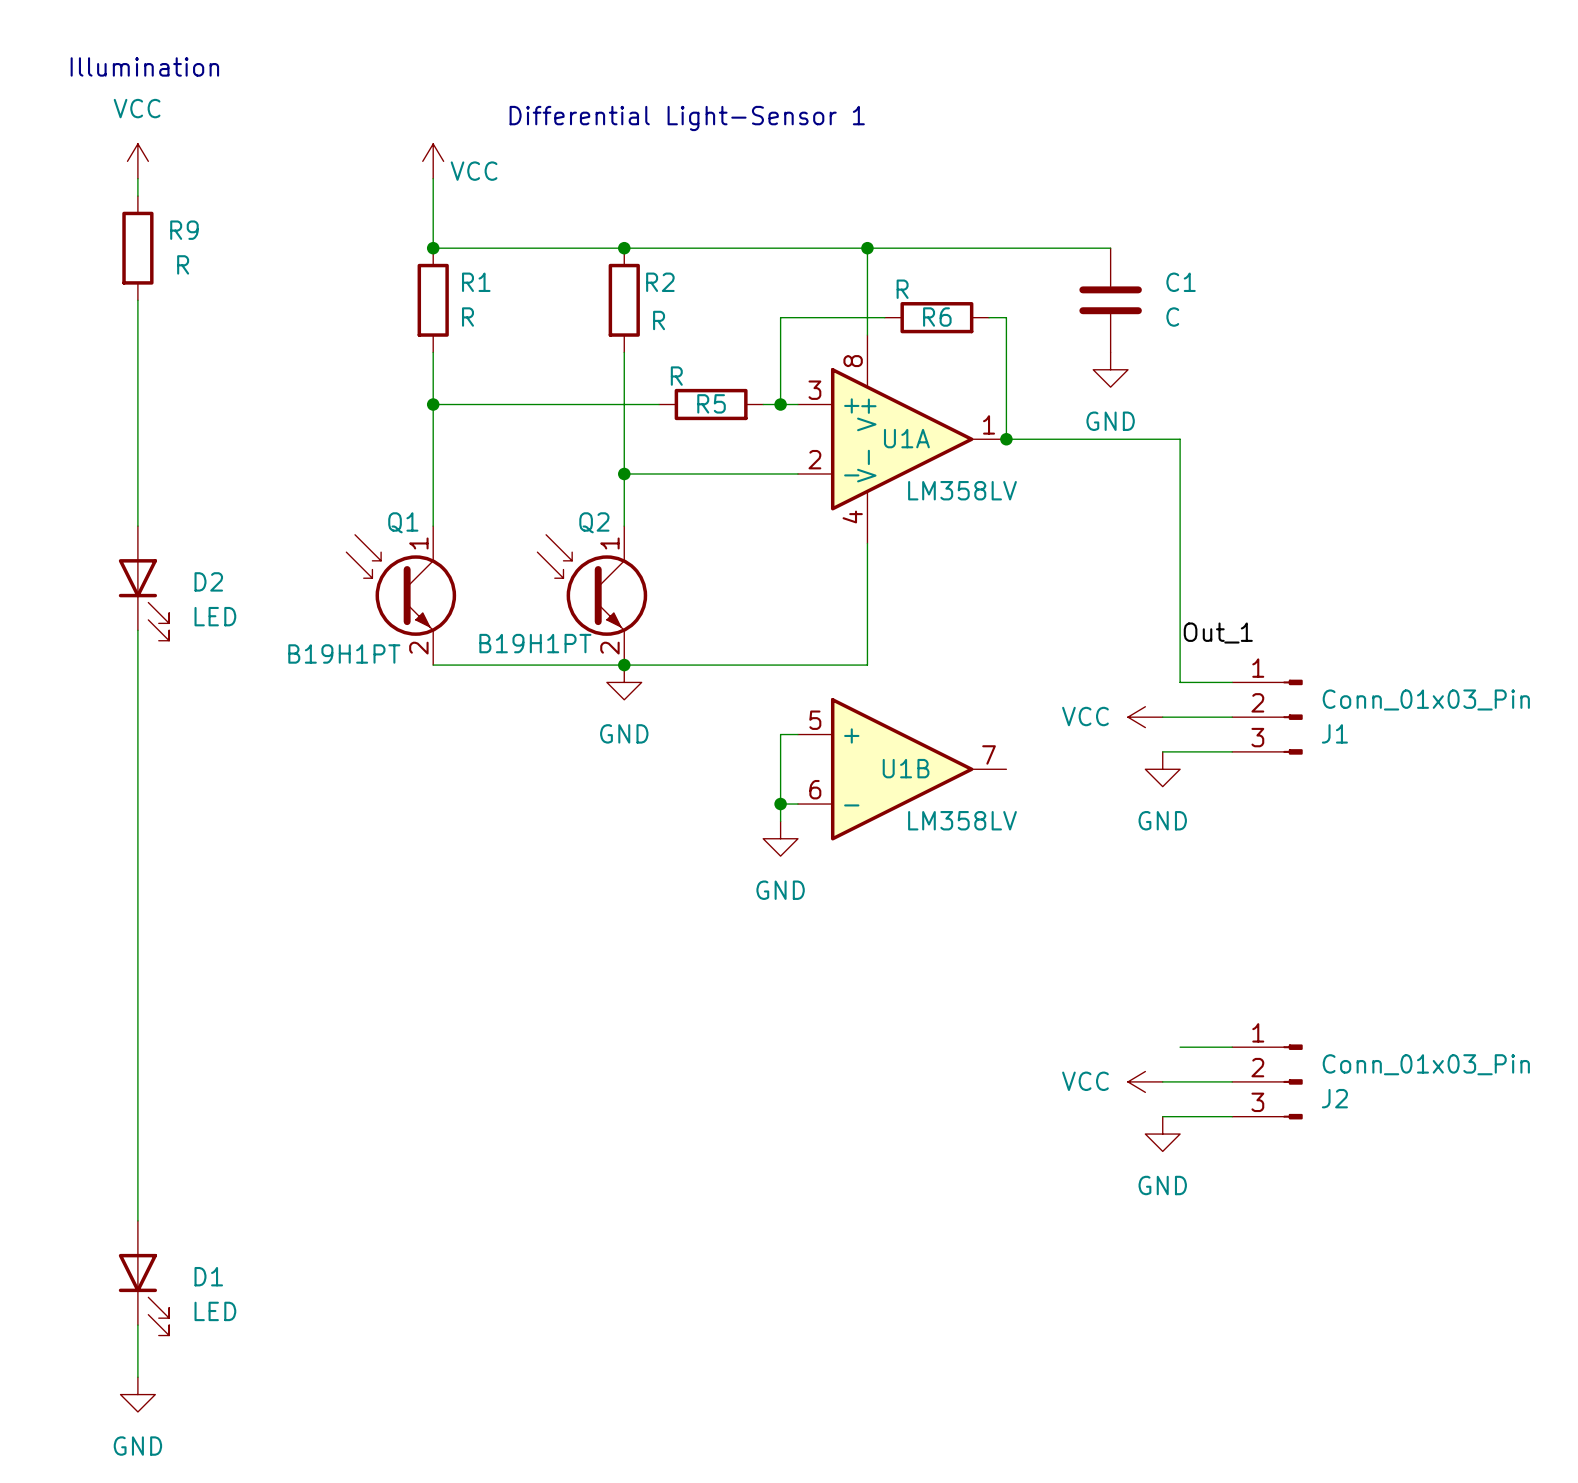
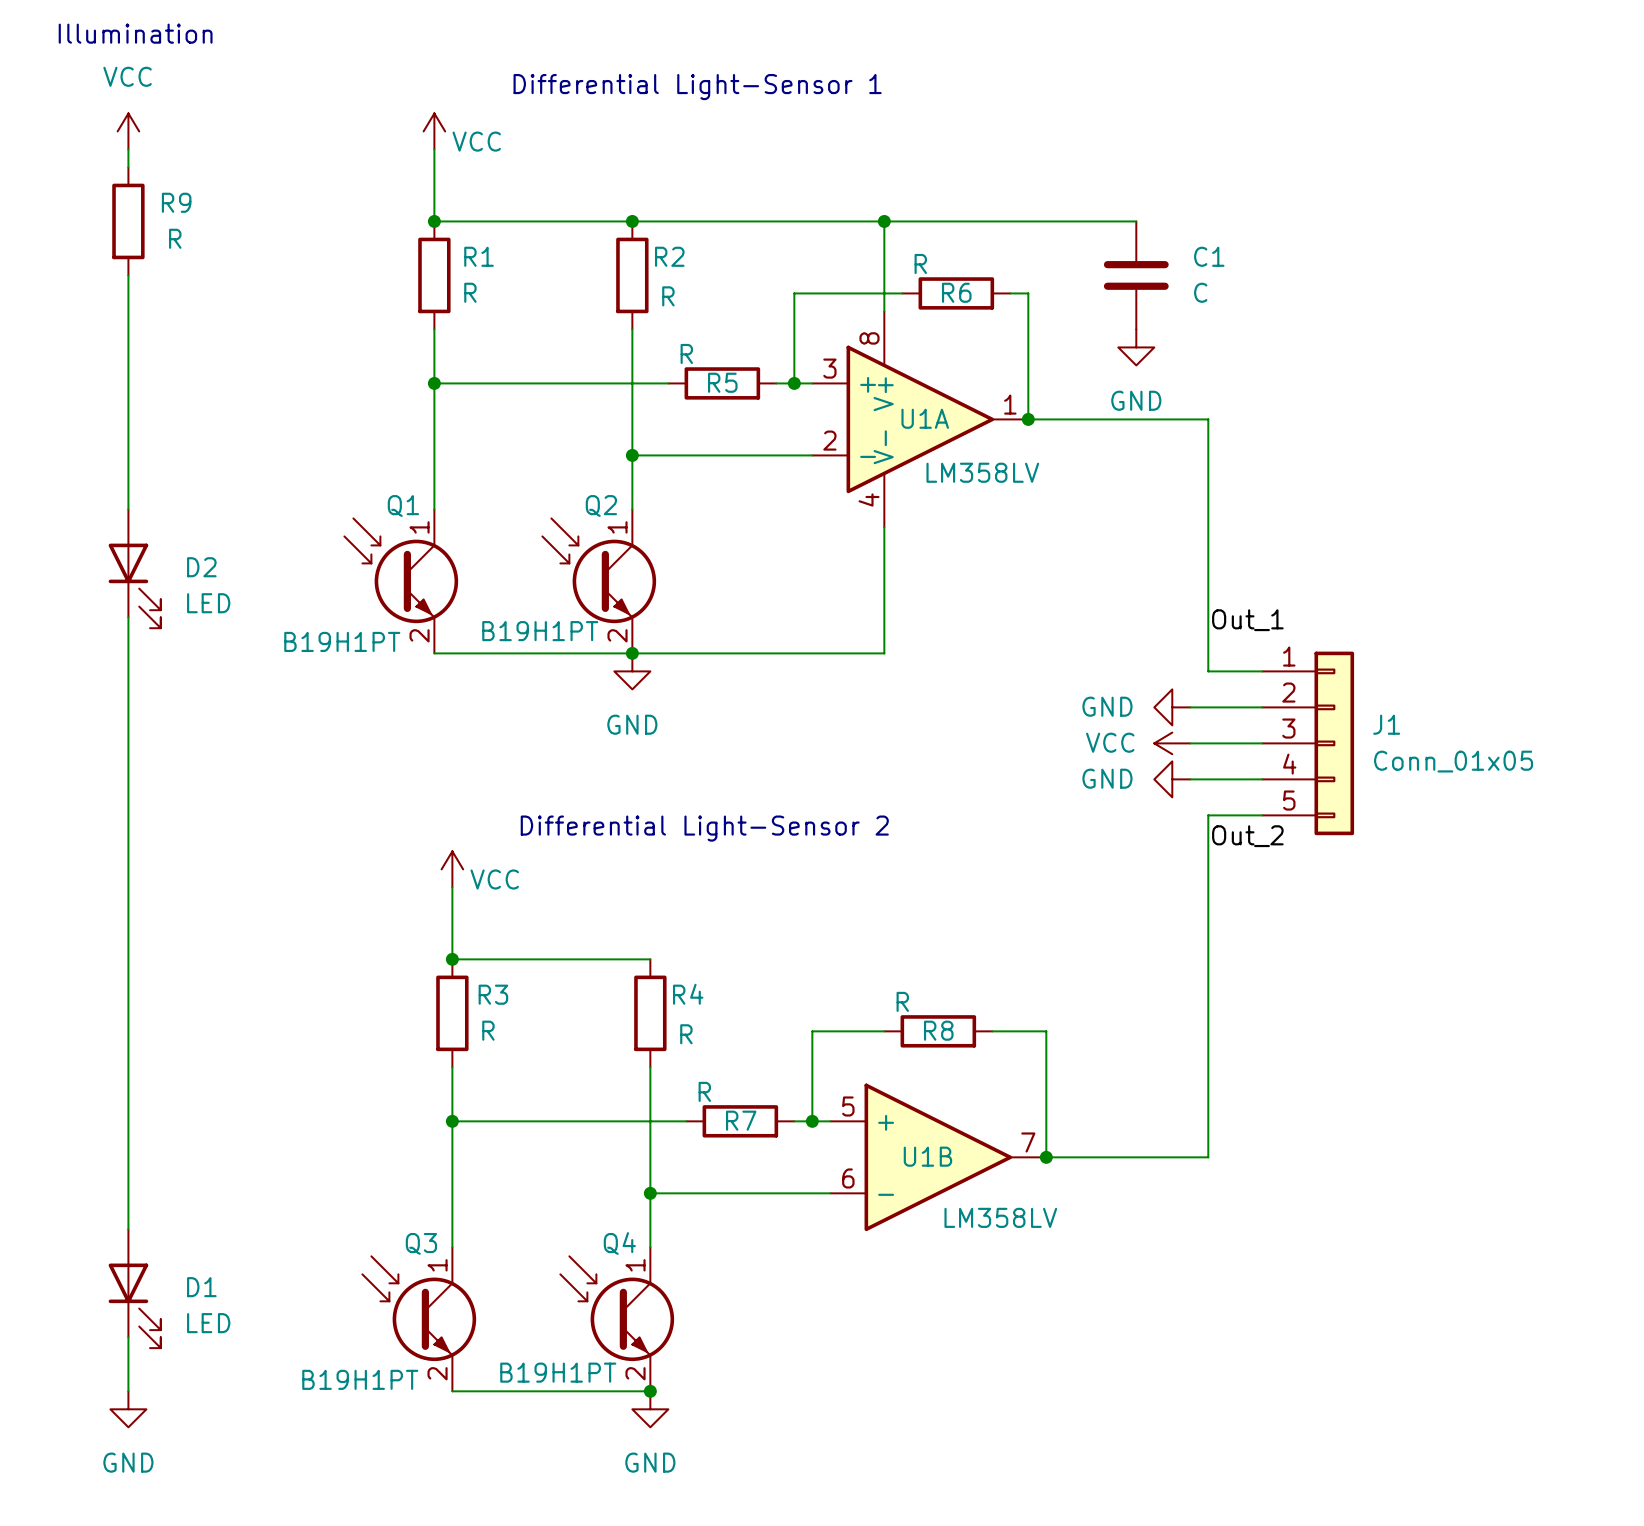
J1 symbol: [1232, 679, 1303, 755] -> [1262, 651, 1355, 836]
J1 value: Conn_01x03_Pin (1426, 699) -> Conn_01x05 (1453, 761)
power symbol: VCC (1145, 717) -> GND (1172, 707)
J1 name position: J1 (1334, 733) -> J1 (1386, 724)
wire: (797, 734) (780, 734) (780, 821) -> none
U1B name position: U1B (906, 768) -> U1B (927, 1156)
U1B position: (902, 769) -> (938, 1157)
power symbol rotation: 0° (1162, 769) -> 90° clockwise (1172, 779)
power symbol position: GND (1162, 769) -> GND (1172, 779)
wire: (780, 804) (797, 804) -> none
junction: (780, 804) -> none
U1B value position: LM358LV (962, 820) -> LM358LV (1000, 1217)
wire: none -> (1262, 815) (1208, 815) (1208, 1157) (1046, 1157) (1046, 1031) (992, 1031)
text: none -> Differential Light-Sensor 2 (704, 828)
power symbol: GND (780, 838) -> none
label: none -> Out_2 (1247, 836)
power symbol: none -> VCC (452, 869)
wire: none -> (452, 887) (452, 959) (650, 959)
junction: none -> (452, 959)
R3: none -> R (452, 1013)
R4: none -> R (650, 1013)
wire: none -> (884, 1031) (812, 1031) (812, 1121)
R8: none -> R (938, 1031)
wire: (1180, 1047) (1232, 1047) -> none
wire: none -> (452, 1067) (452, 1247)
wire: none -> (650, 1067) (650, 1247)
power symbol position: VCC (1145, 1081) -> VCC (1172, 743)
wire: (1162, 1081) (1232, 1081) -> (1190, 779) (1262, 779)
J2: Conn_01x03_Pin (1267, 1081) -> none
wire: none -> (452, 1121) (686, 1121)
junction: none -> (452, 1121)
R7: none -> R (740, 1121)
wire: none -> (794, 1121) (830, 1121)
junction: none -> (812, 1121)
wire: (1162, 1116) (1232, 1116) -> none
power symbol: GND (1162, 1134) -> none
junction: none -> (1046, 1157)
wire: none -> (650, 1193) (830, 1193)
junction: none -> (650, 1193)
Q3: none -> B19H1PT (419, 1319)
Q4: none -> B19H1PT (617, 1319)
wire: none -> (452, 1391) (650, 1391)
junction: none -> (650, 1391)
power symbol: none -> GND (650, 1409)

